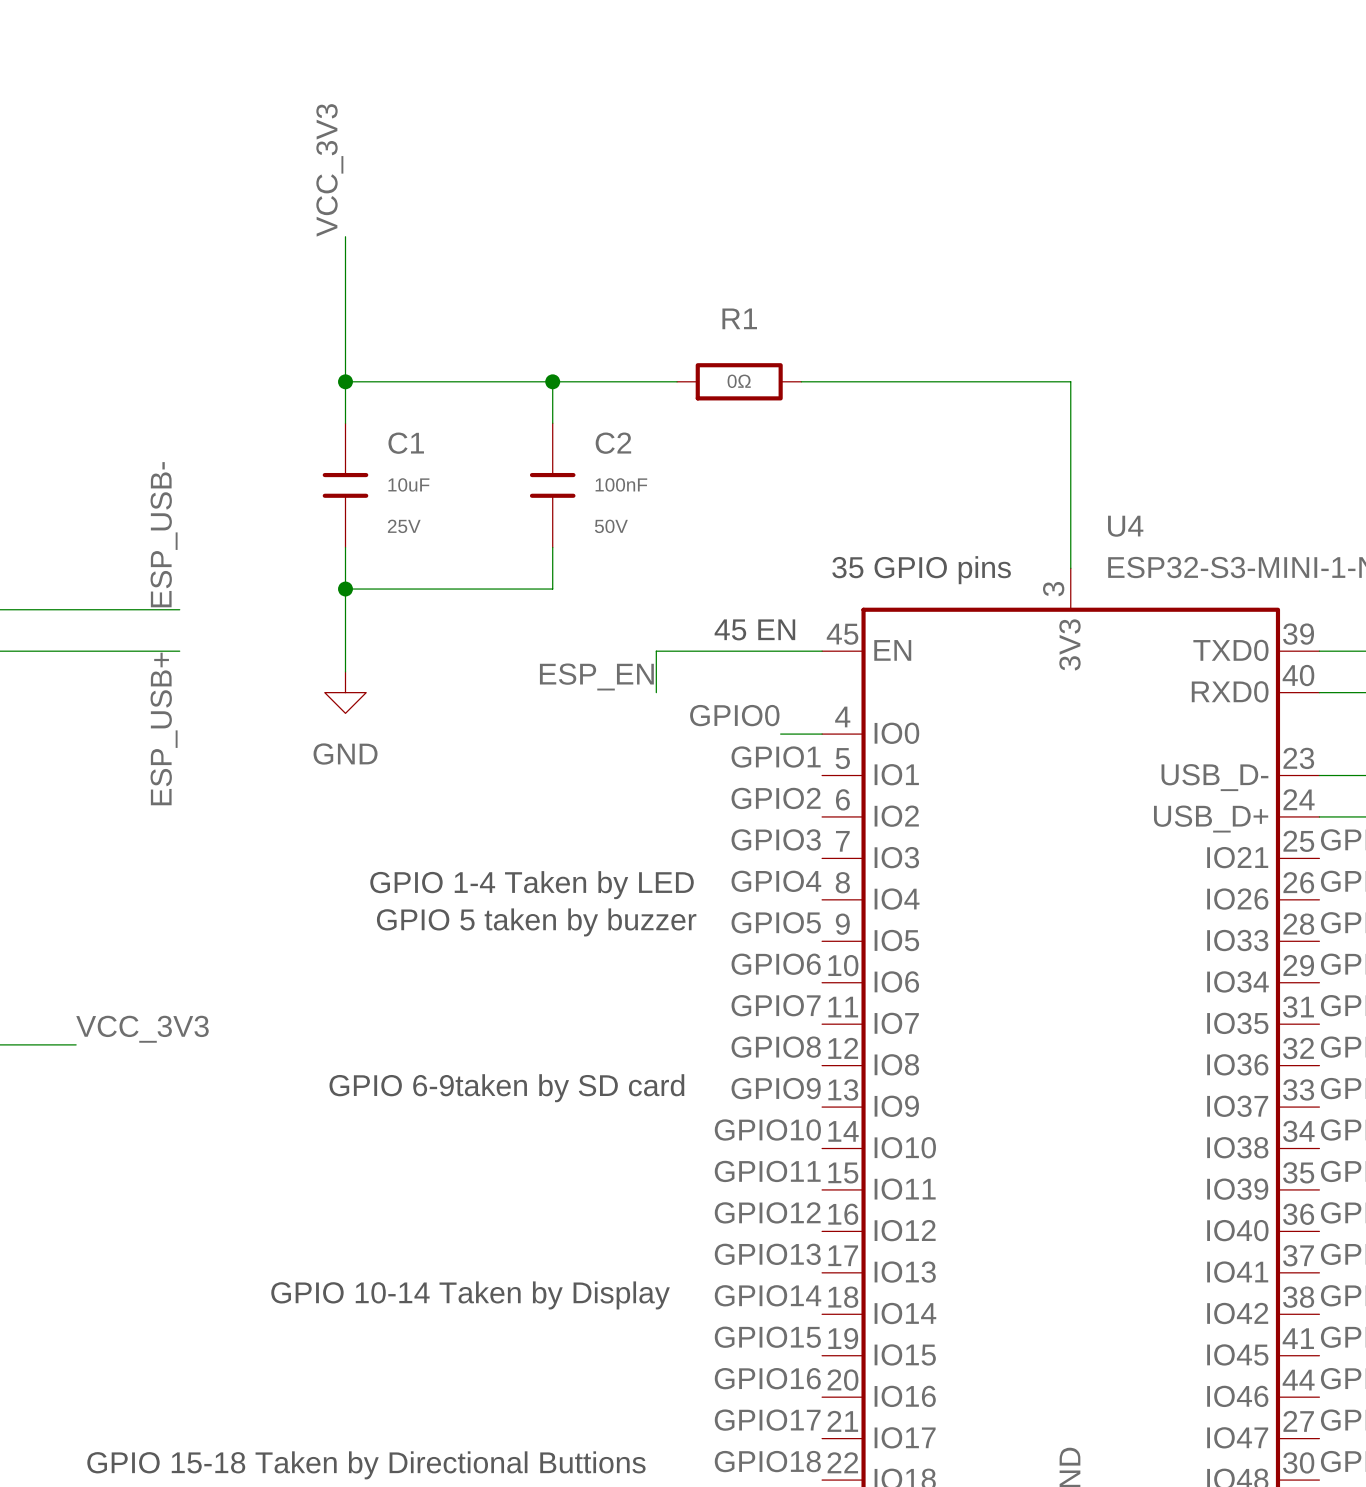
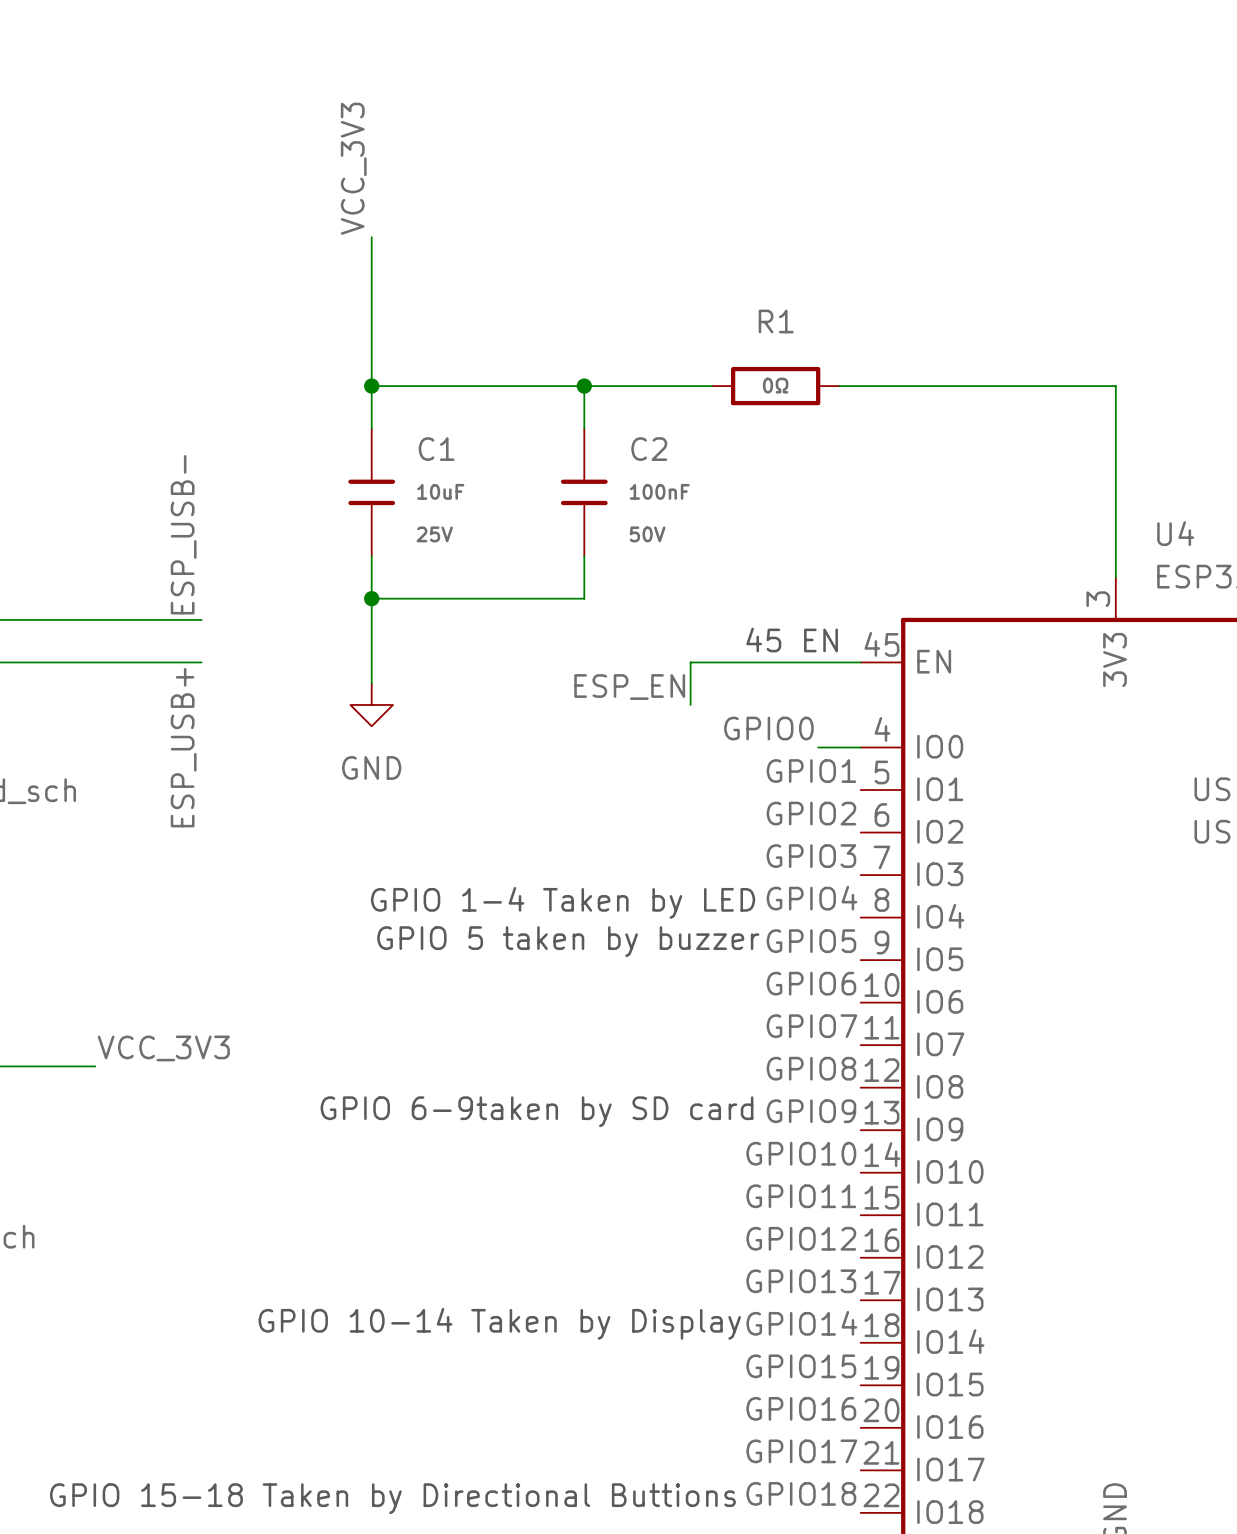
text: 35 GPIO pins (921, 570) -> none

